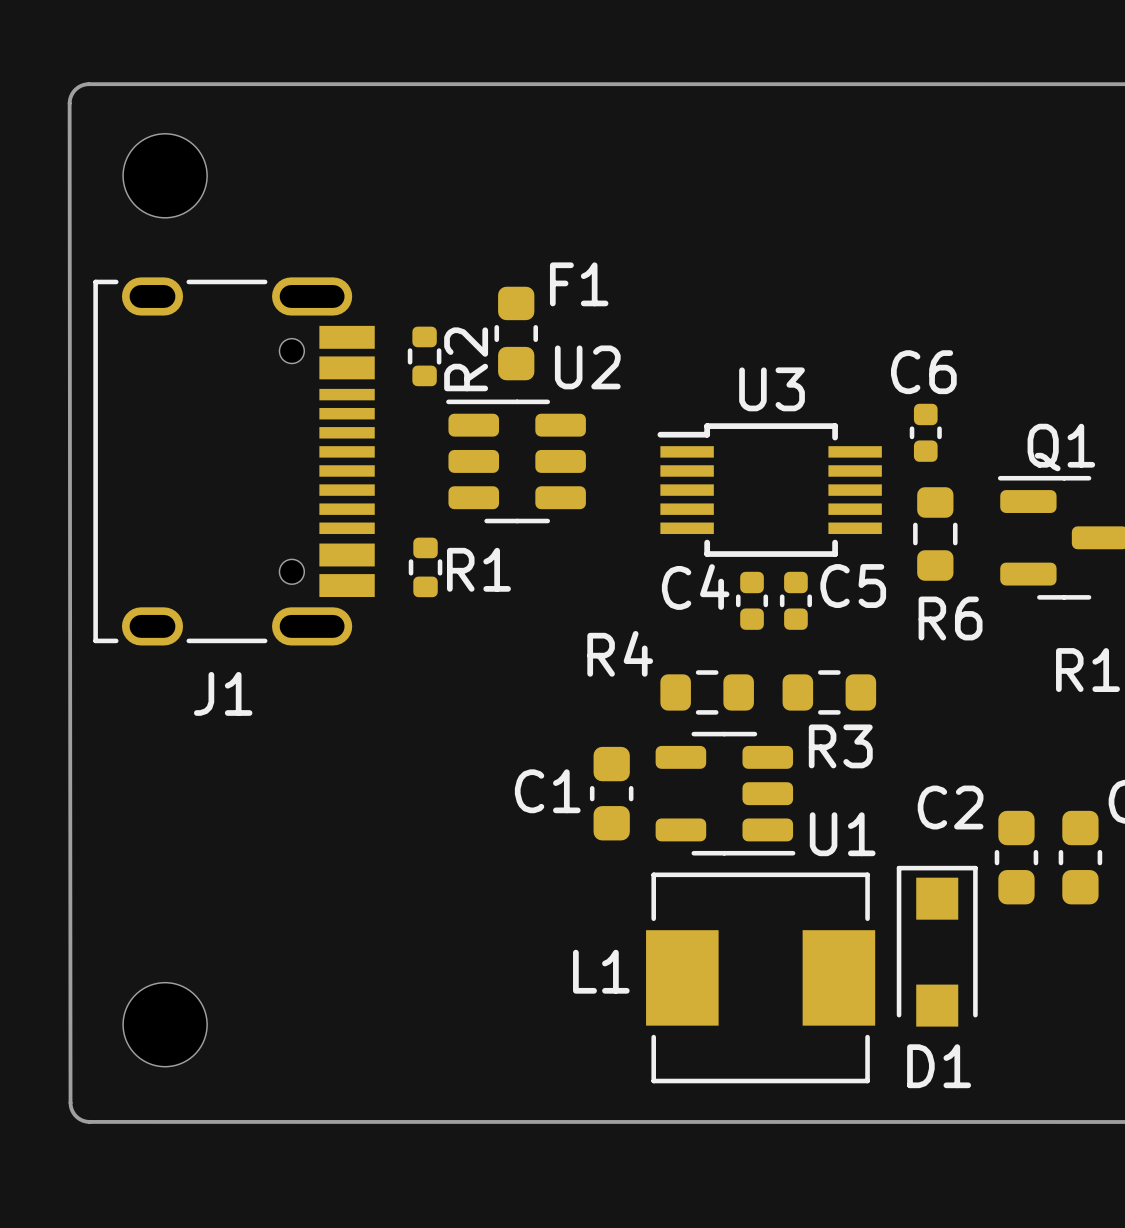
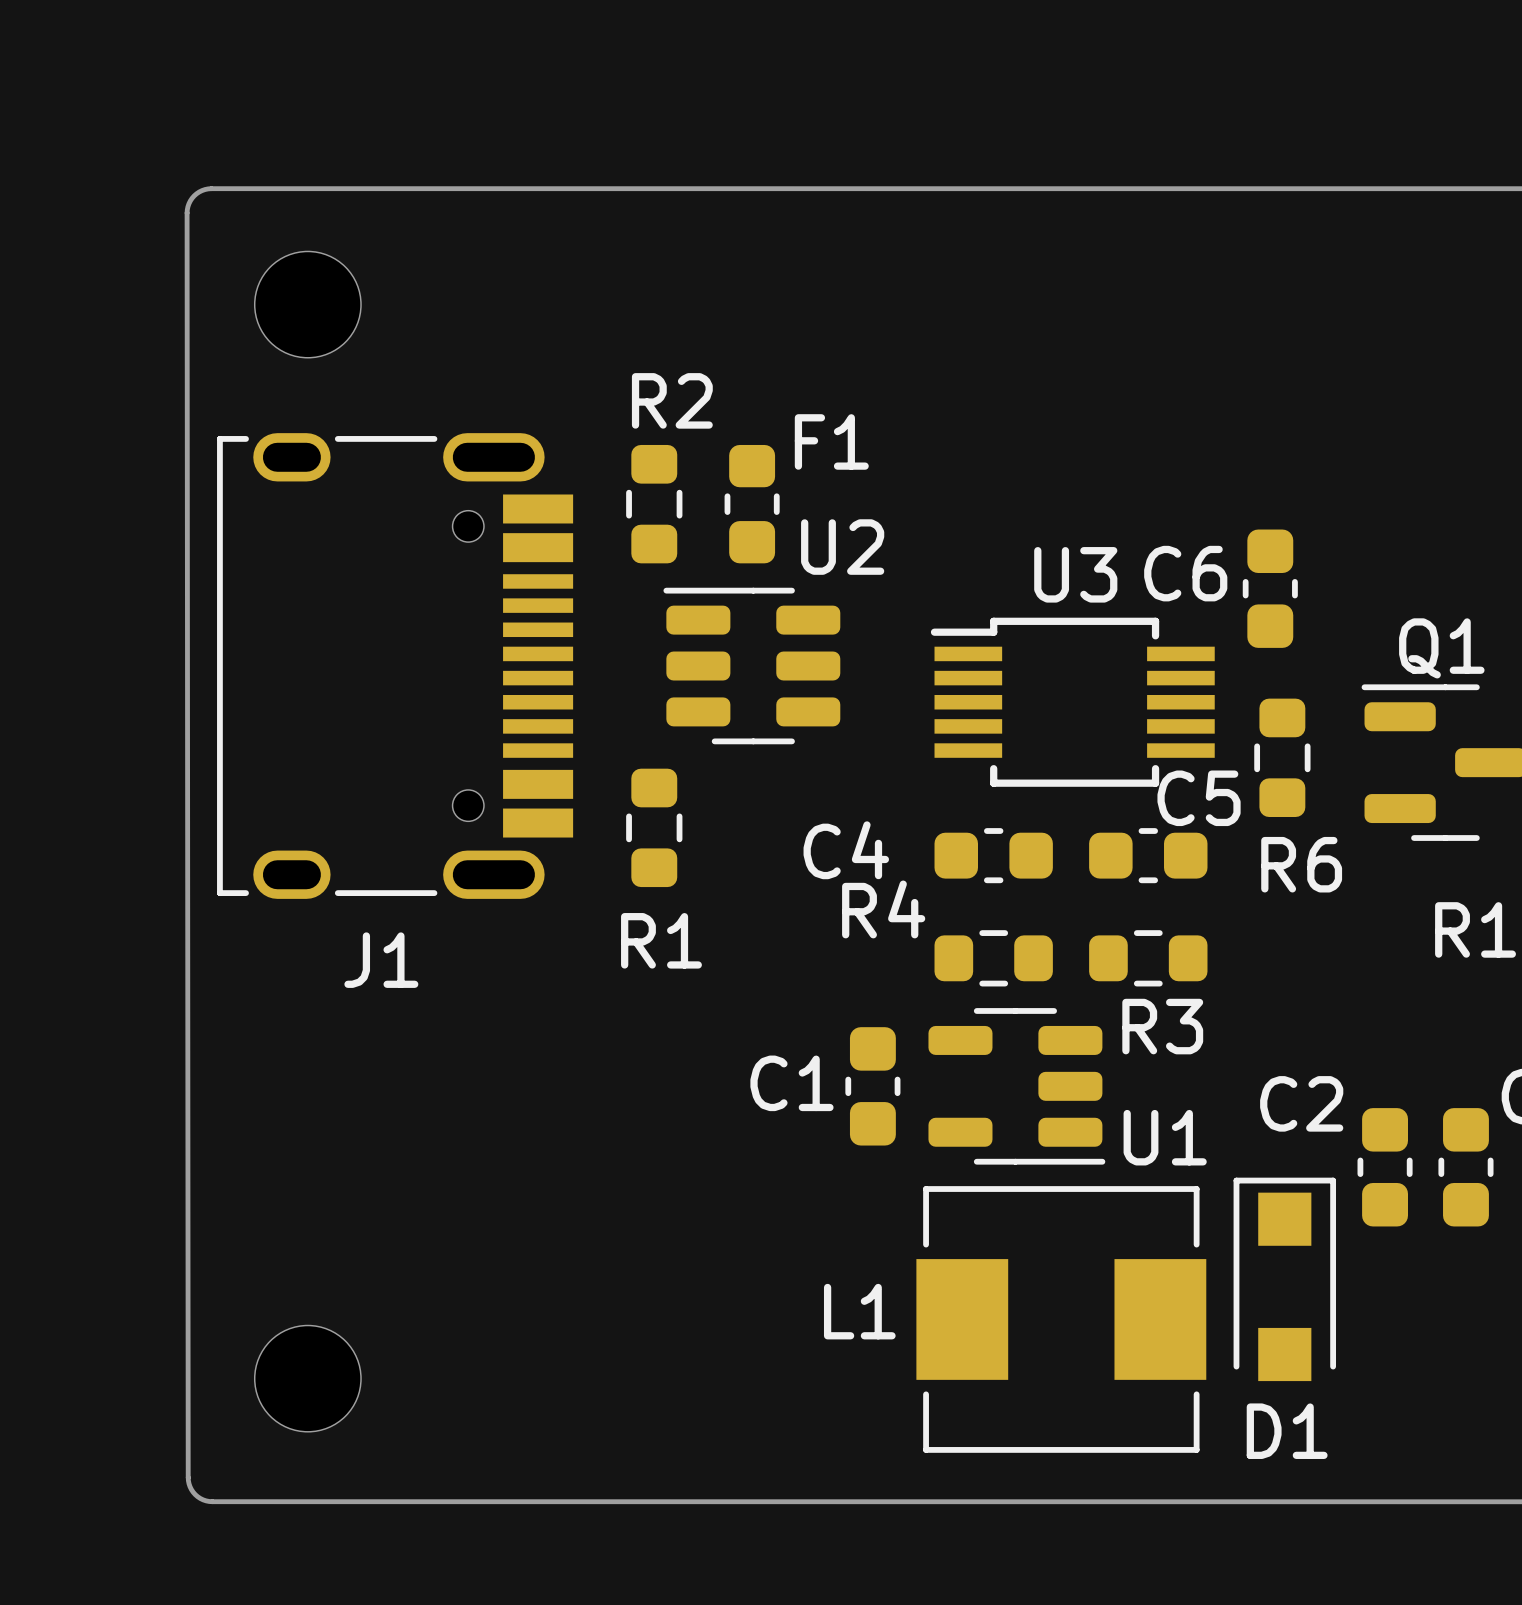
R2 footprint: [407, 326, 442, 387] -> [626, 444, 683, 564]
R2 name position: R2 (466, 359) -> R2 (672, 400)
C6 name position: C6 (923, 372) -> C6 (1185, 573)
C6 footprint: [909, 403, 942, 462] -> [1242, 529, 1298, 648]
R1 footprint: [408, 537, 443, 598] -> [626, 768, 683, 888]
R1 name position: R1 (478, 569) -> R1 (661, 940)
C4 footprint: [735, 571, 769, 630] -> [934, 828, 1053, 884]
C5 footprint: [779, 571, 812, 630] -> [1089, 828, 1208, 884]

